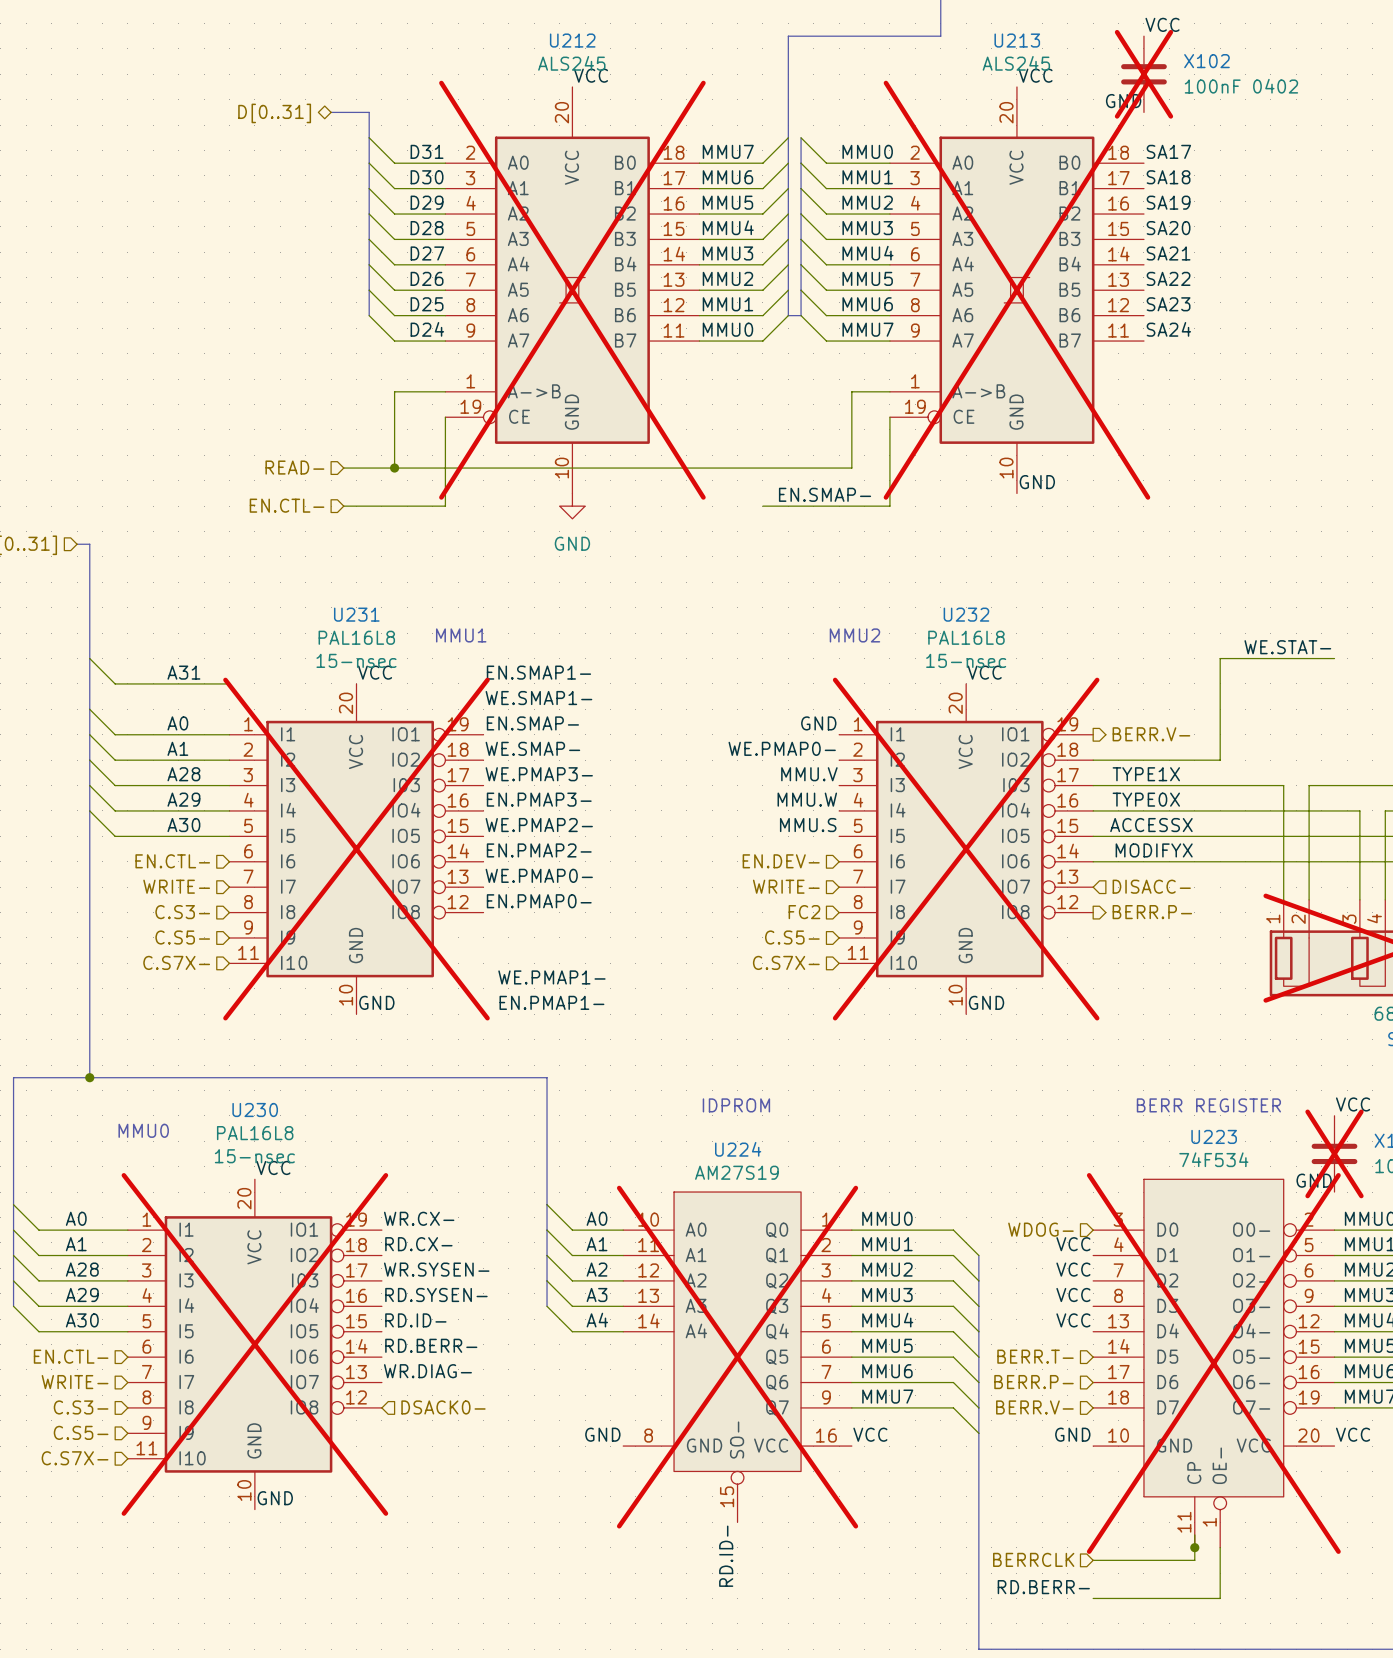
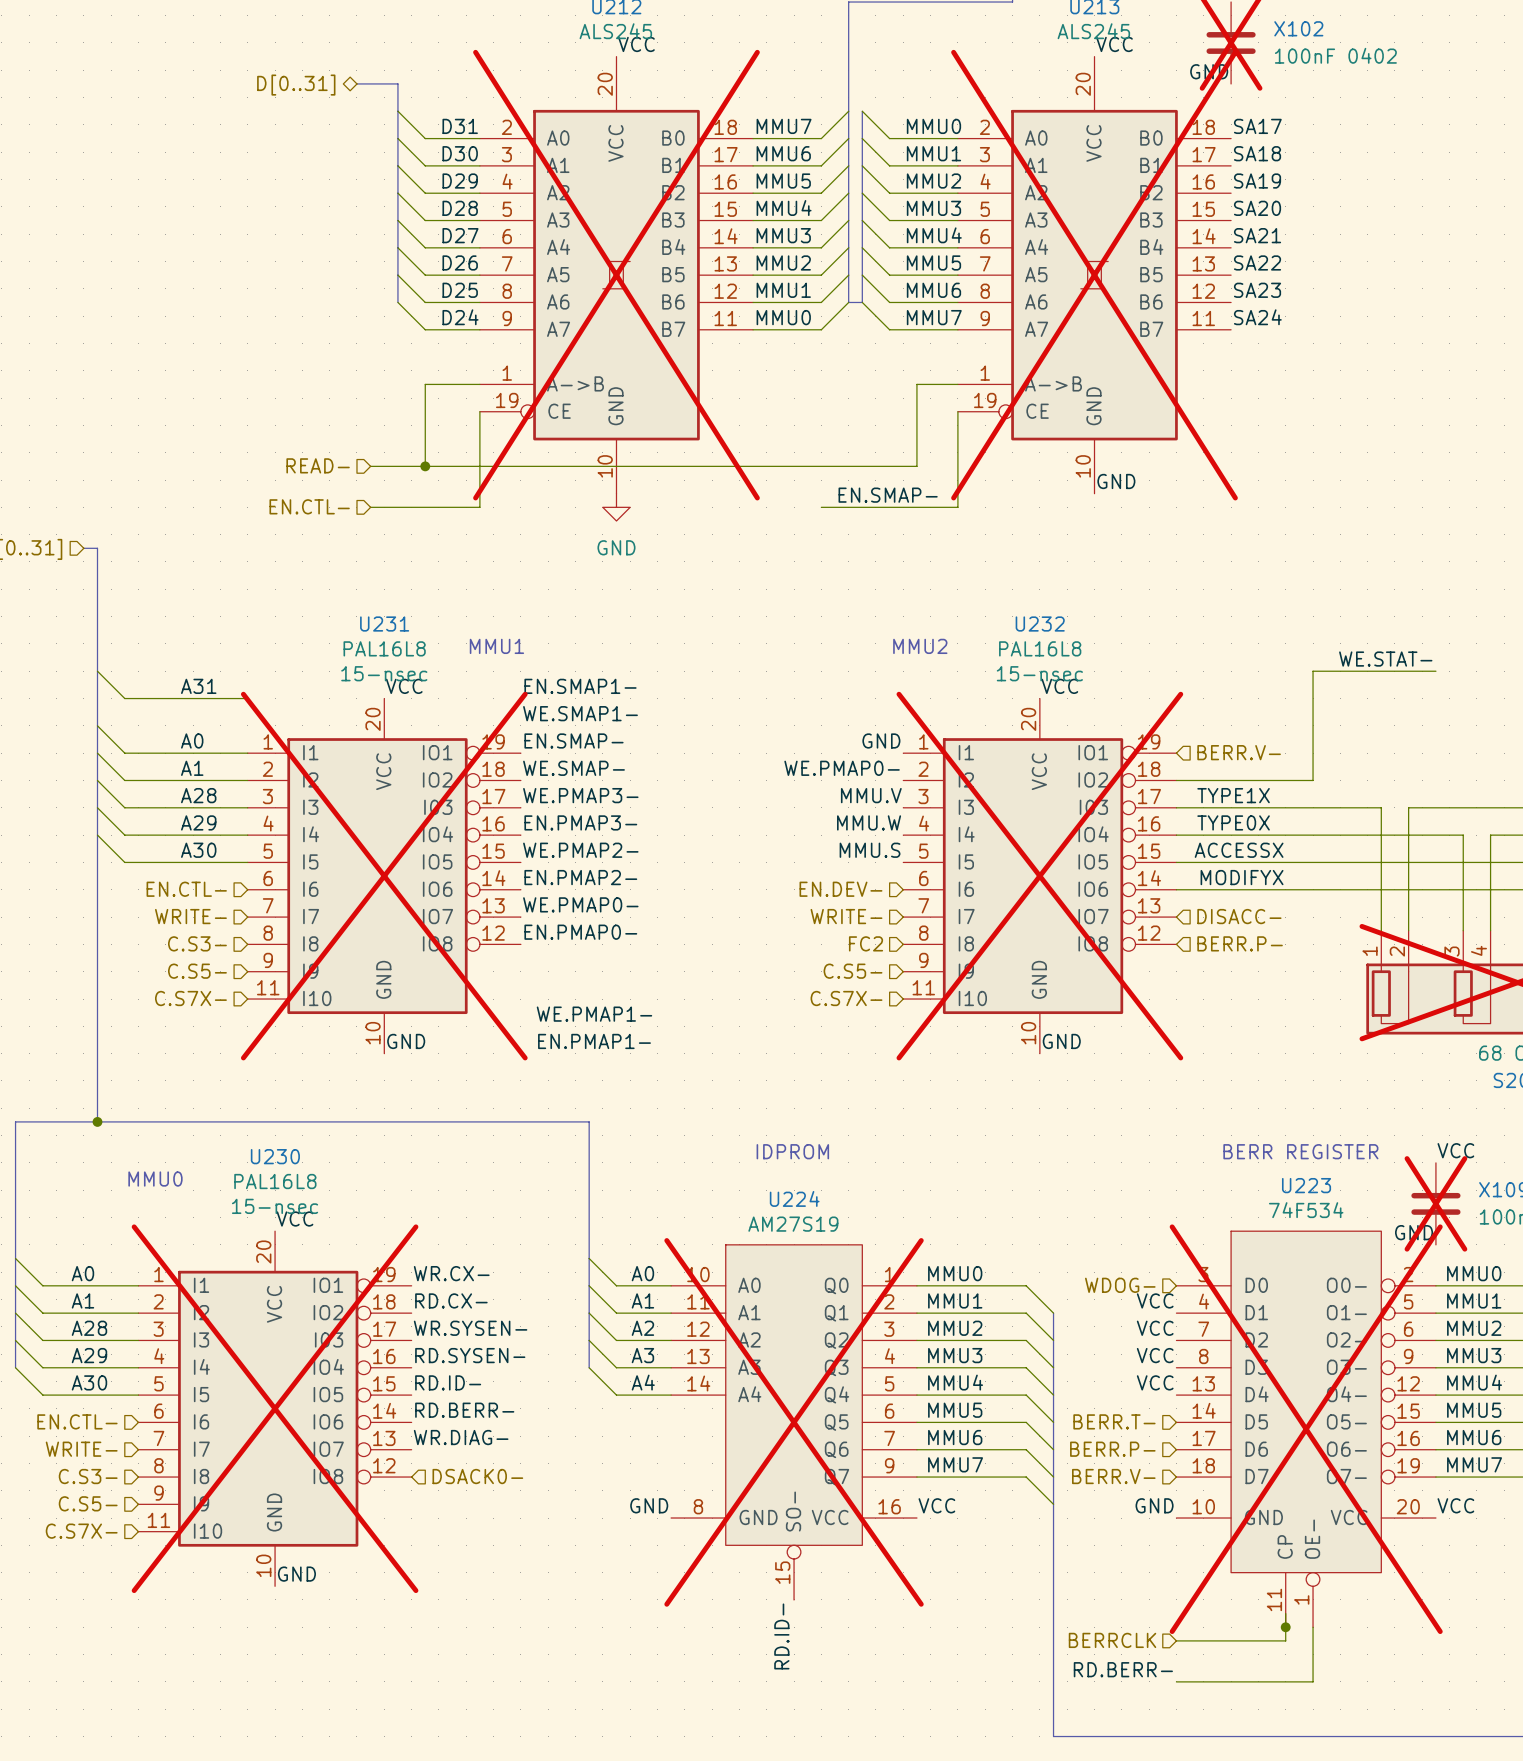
hierarchical label shape: output (1151, 734) -> input (1239, 752)
hierarchical label shape: output (1152, 912) -> input (1240, 943)

